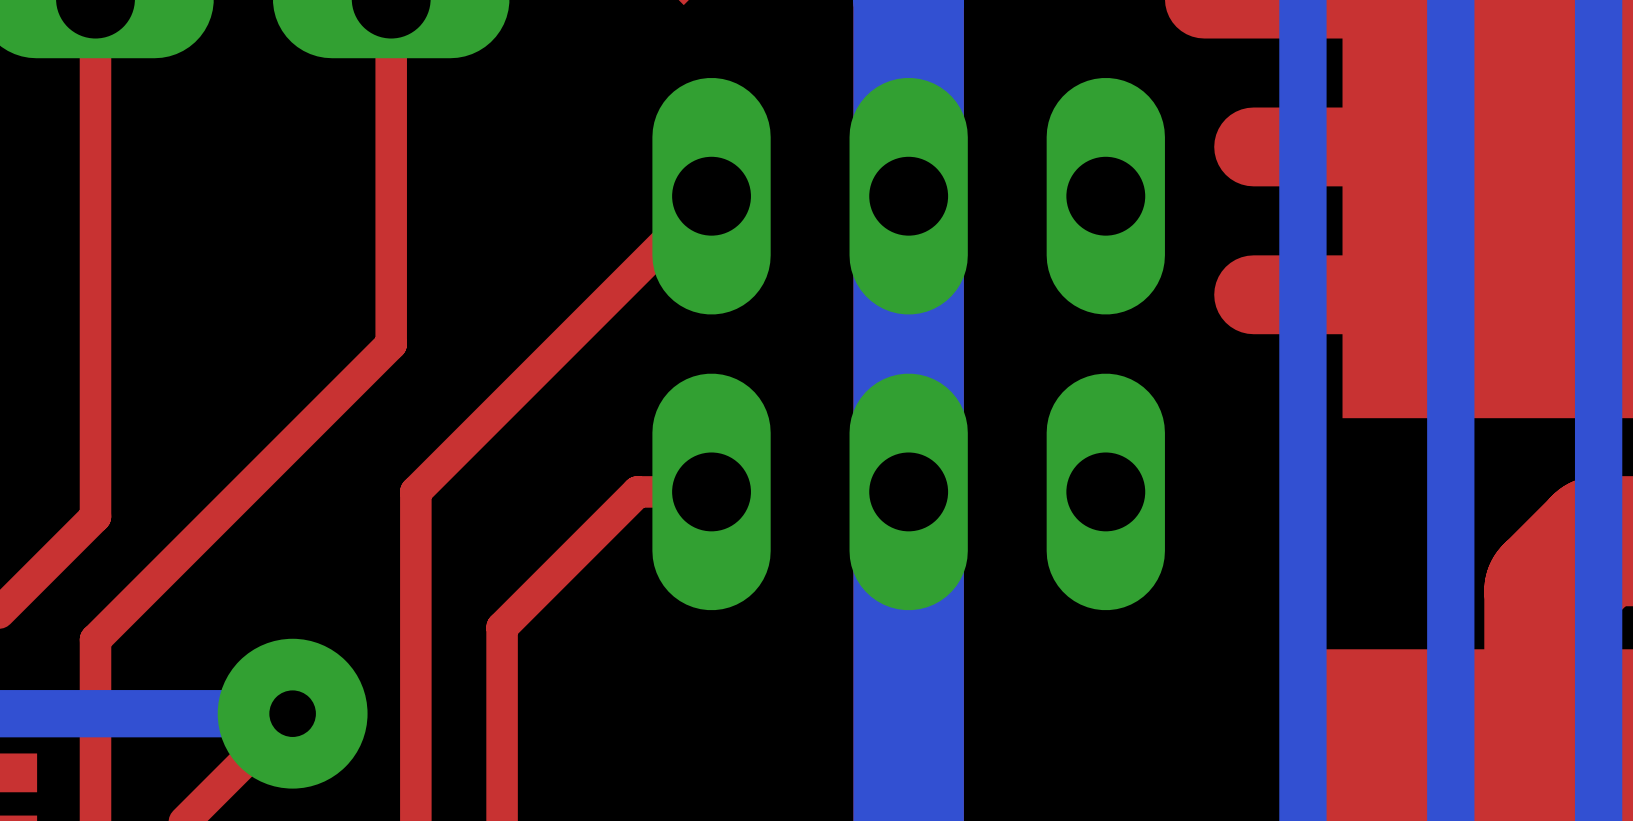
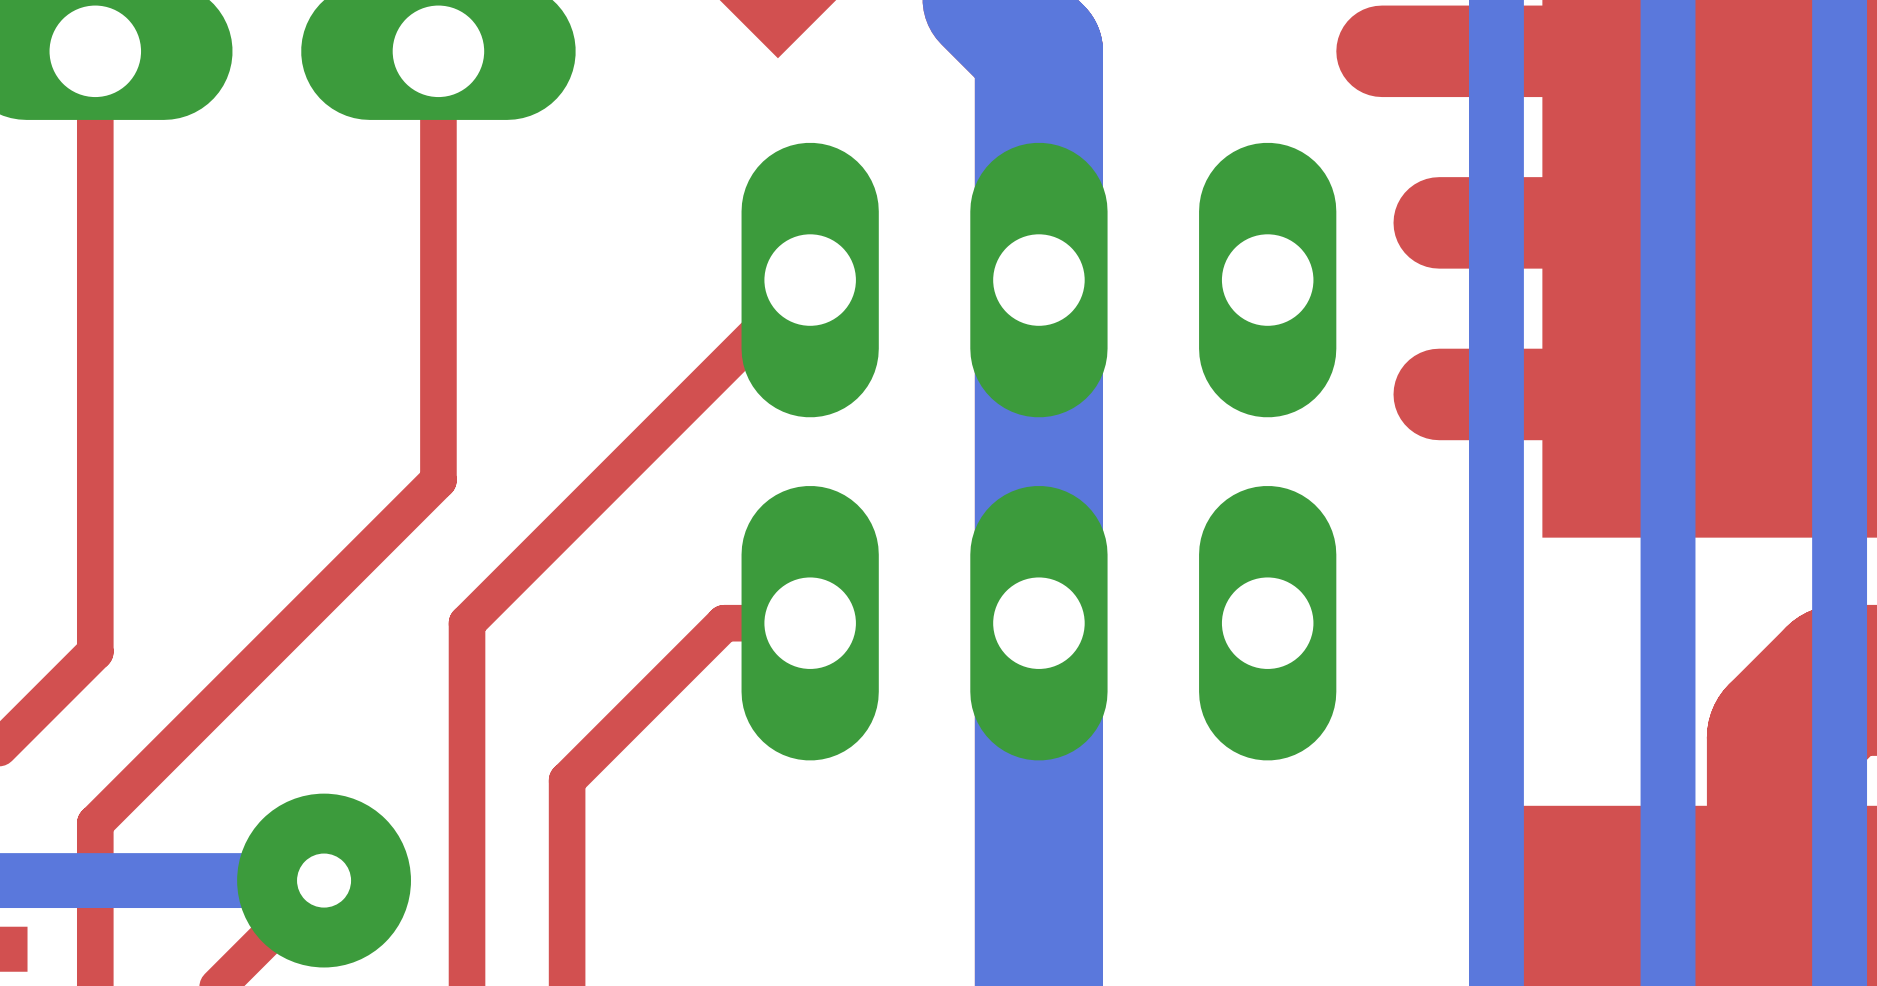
top track: (391, 344) (95, 639) (95, 664) -> (438, 451) (438, 480) (95, 823)

